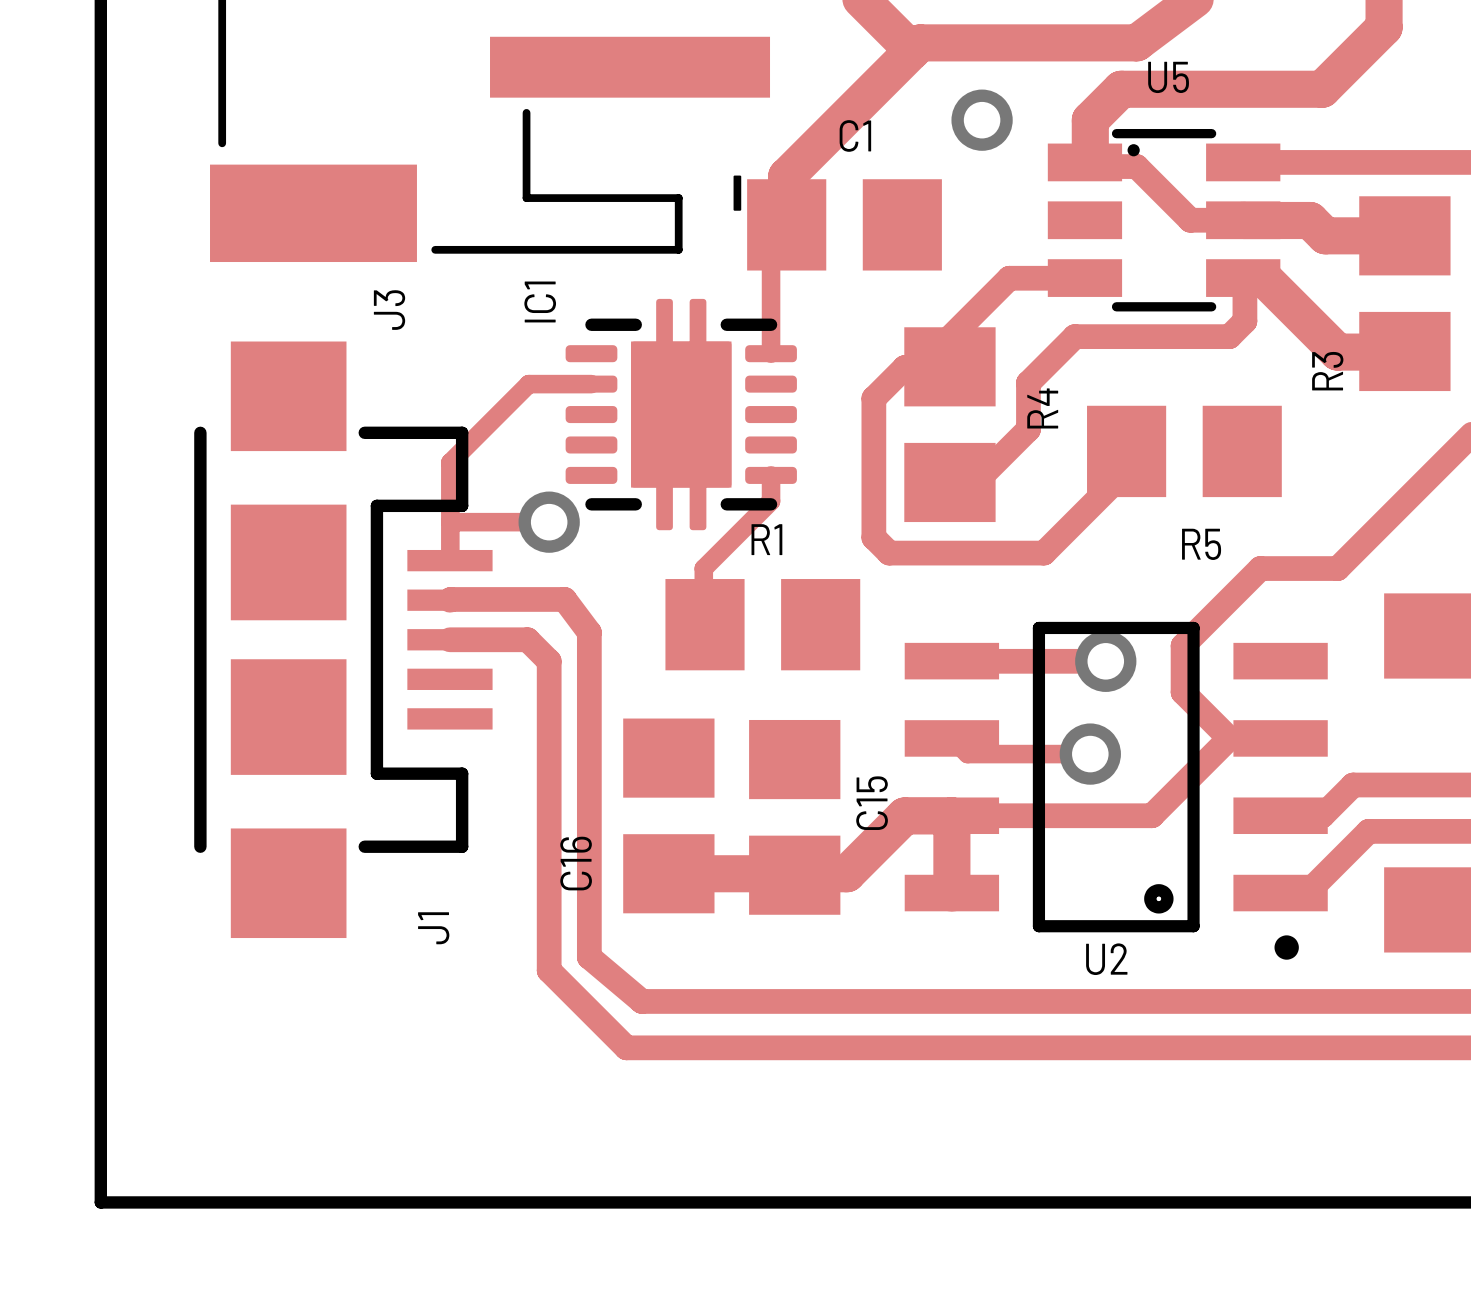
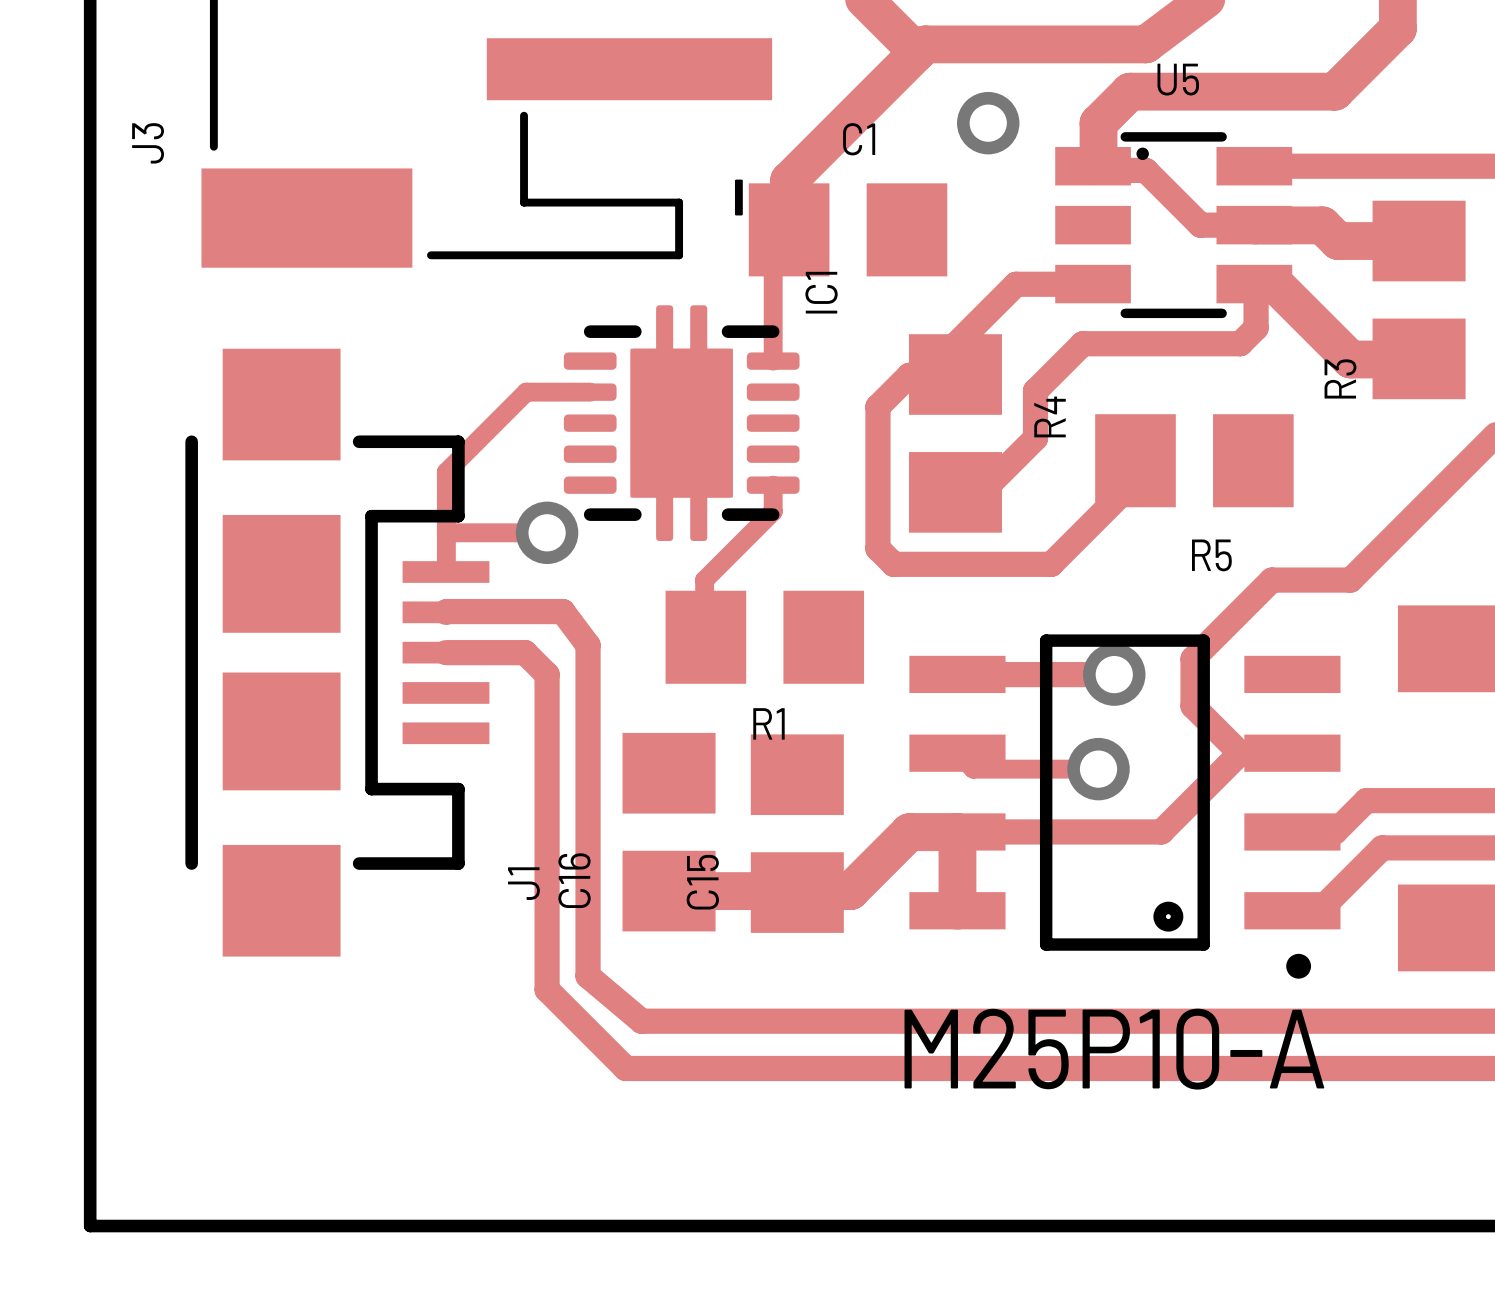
IC1 name position: IC1 (540, 301) -> IC1 (821, 292)
J3 name position: J3 (389, 310) -> J3 (148, 143)
R1 name position: R1 (766, 539) -> R1 (768, 723)
C15 name position: C15 (872, 803) -> C15 (702, 882)
J1 name position: J1 (433, 928) -> J1 (523, 883)
U2 name: U2 (1106, 959) -> none
U2 text: none -> M25P10-A (1114, 1049)

